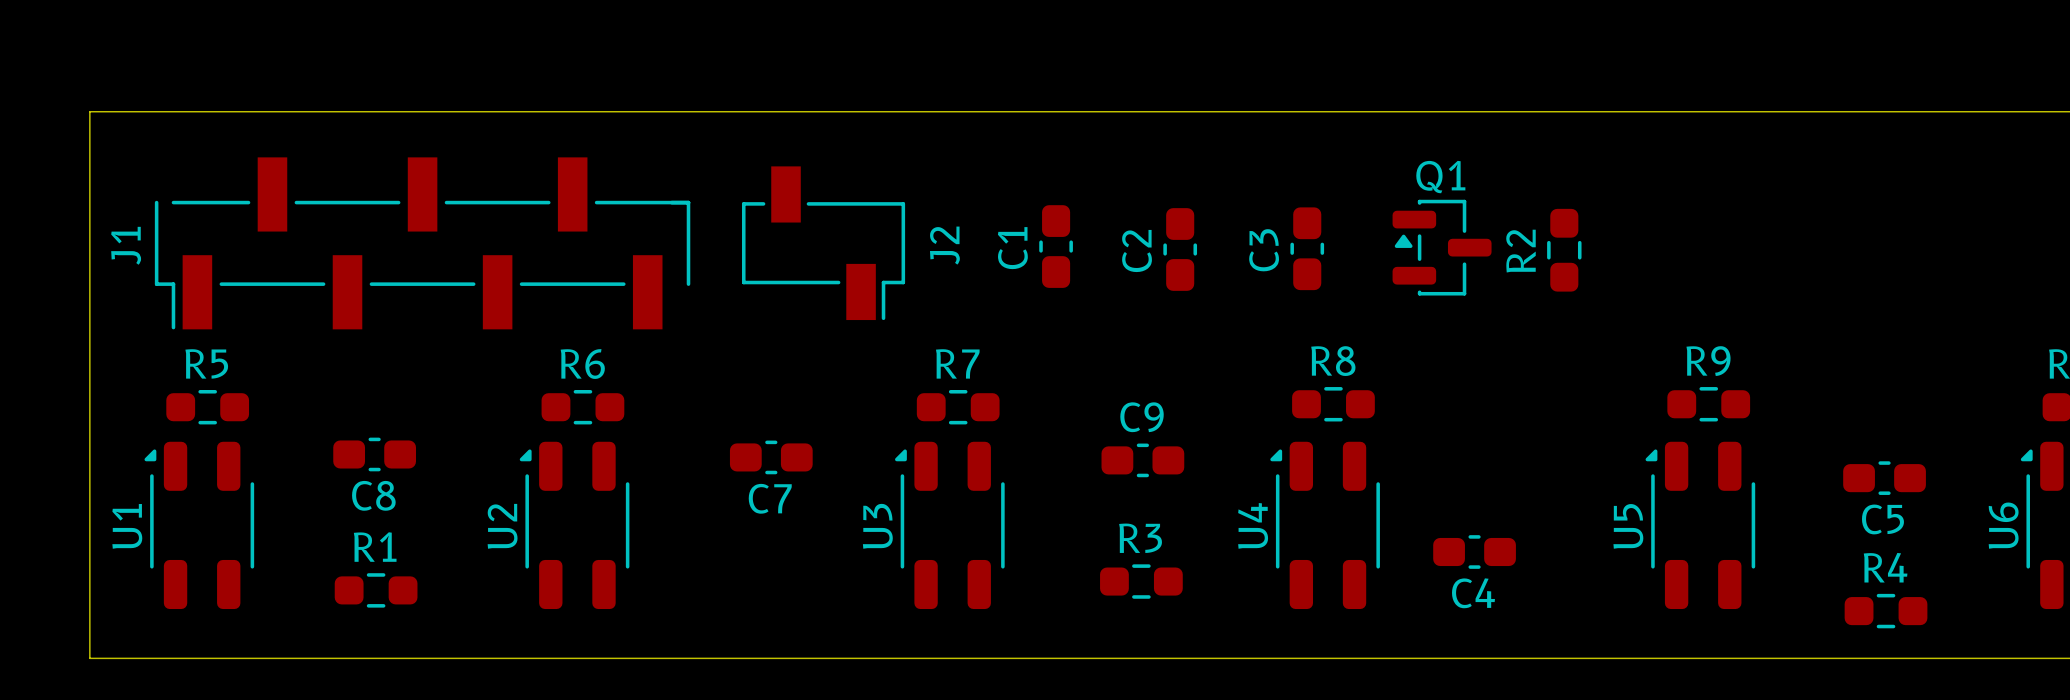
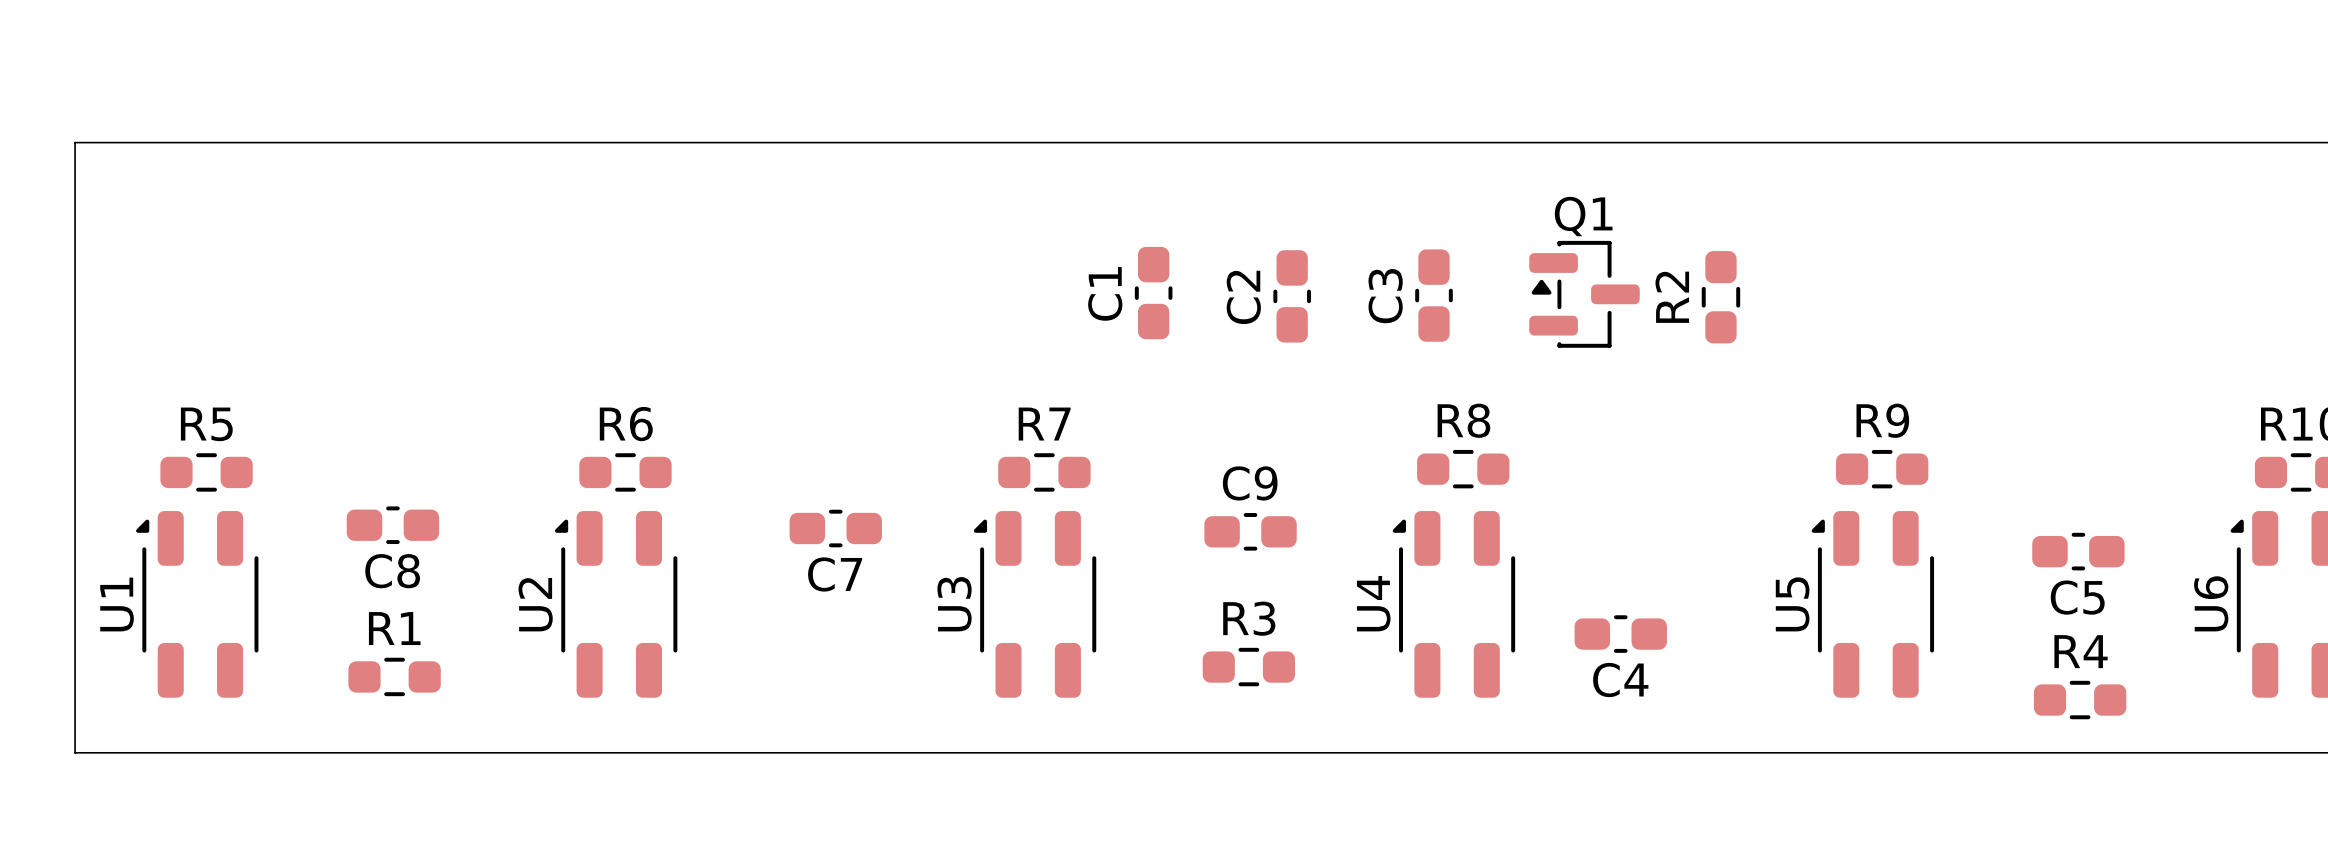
J1: (422, 243) -> none
J2: (823, 243) -> none

